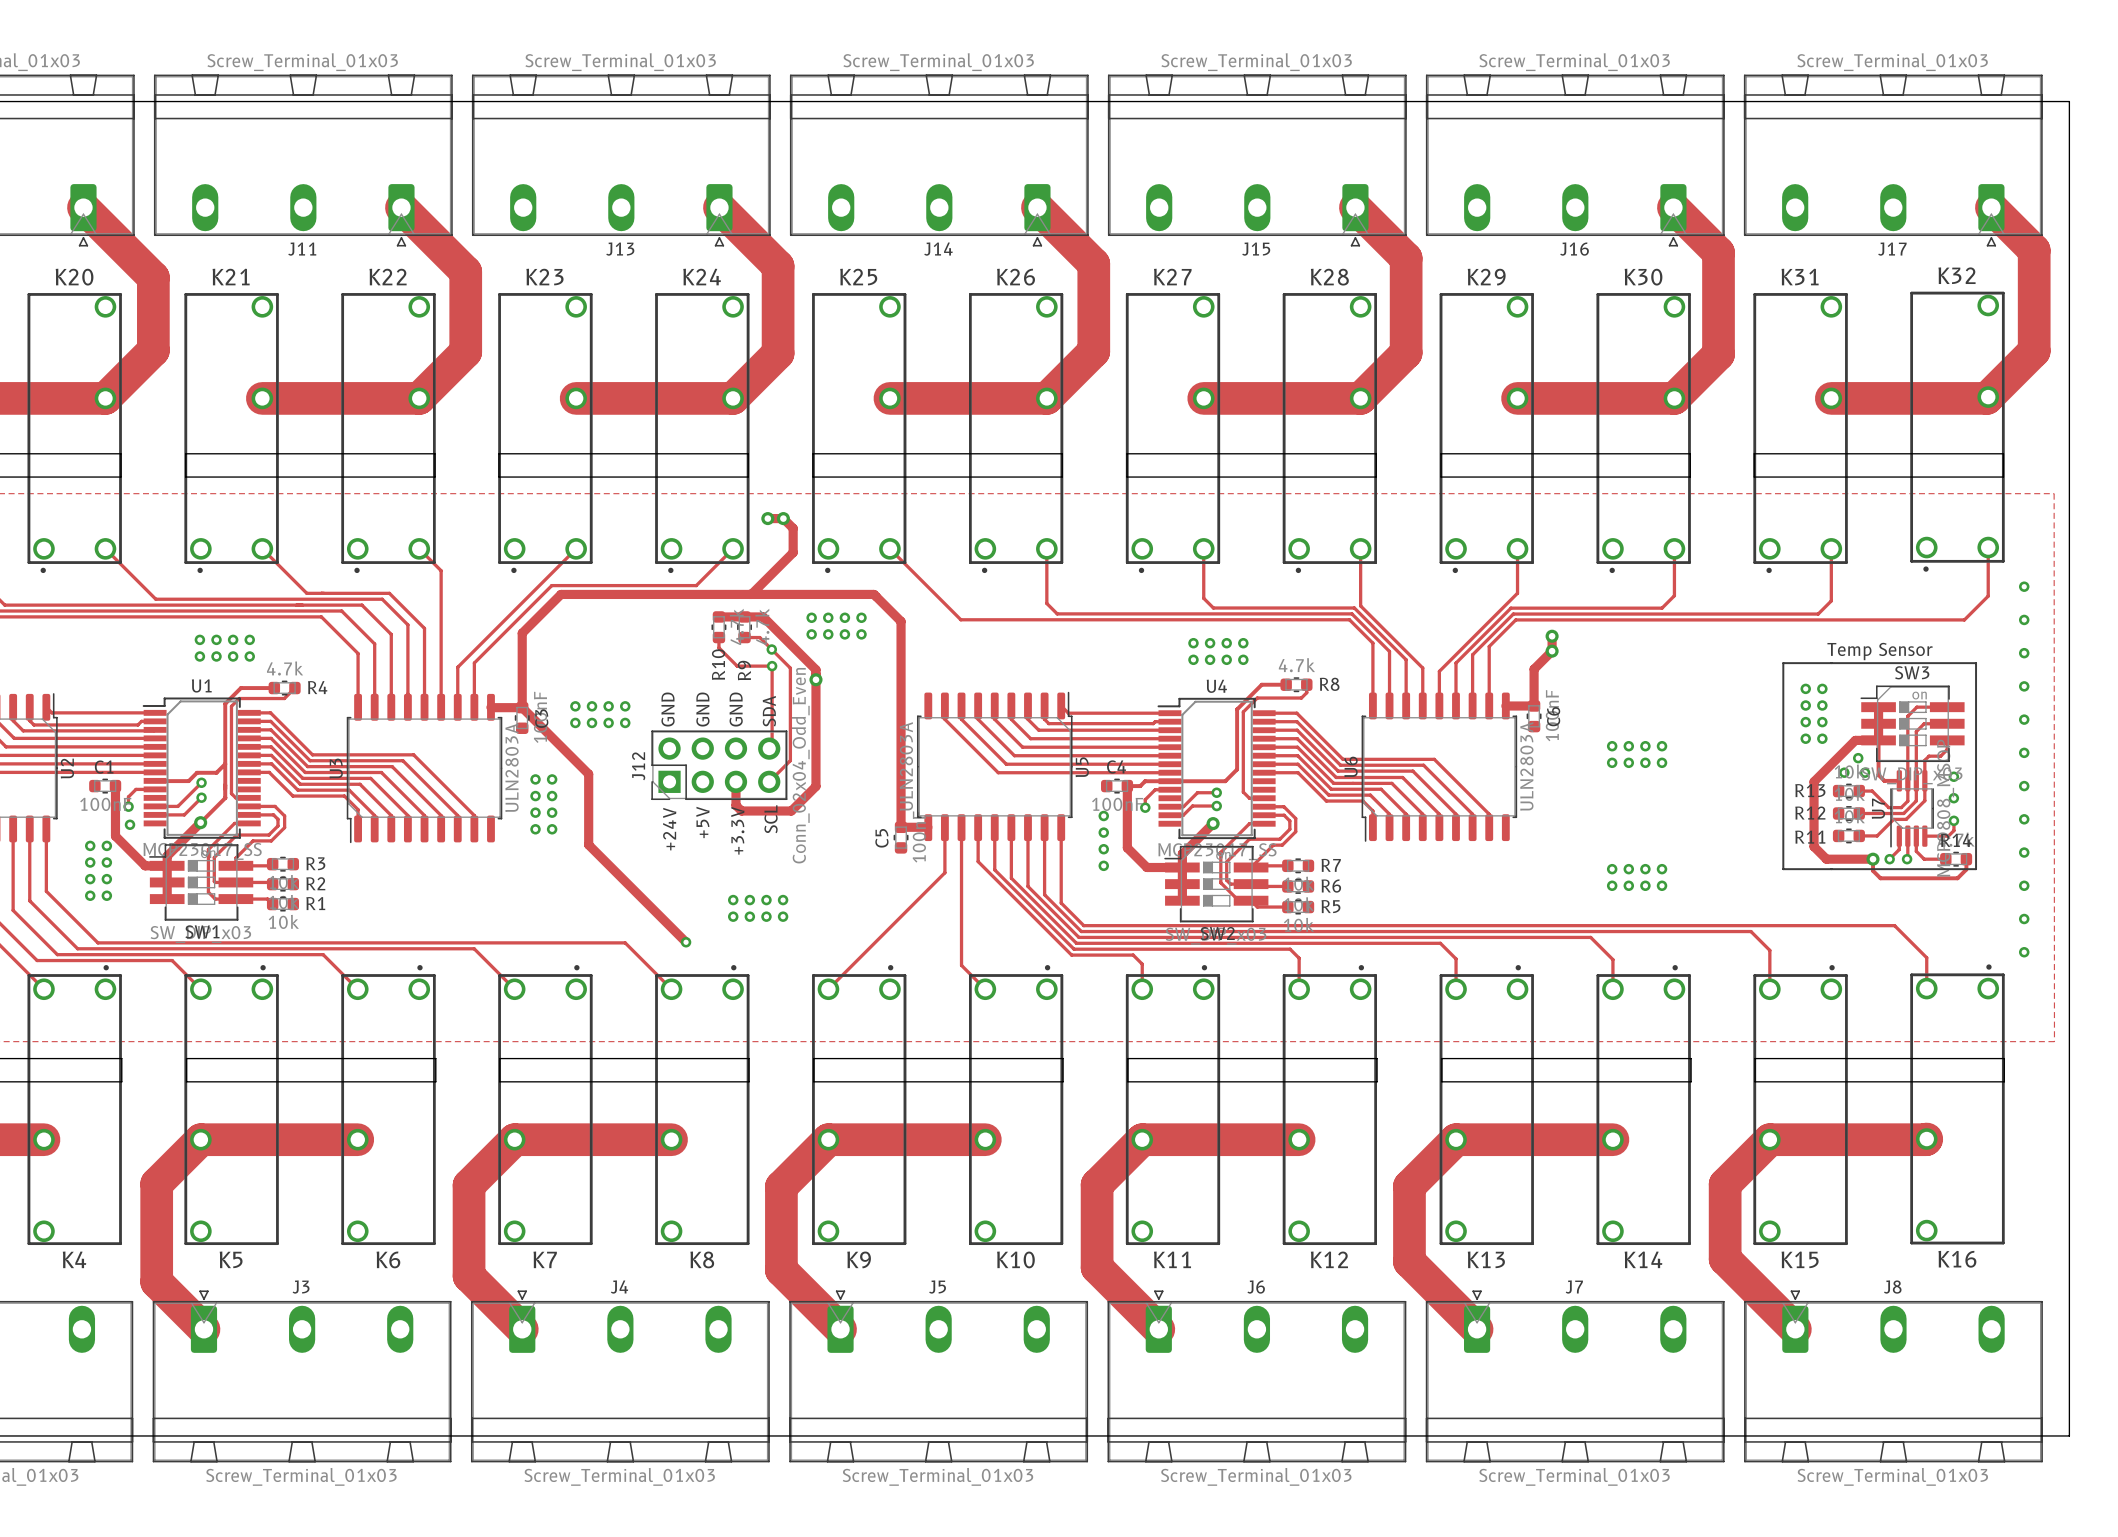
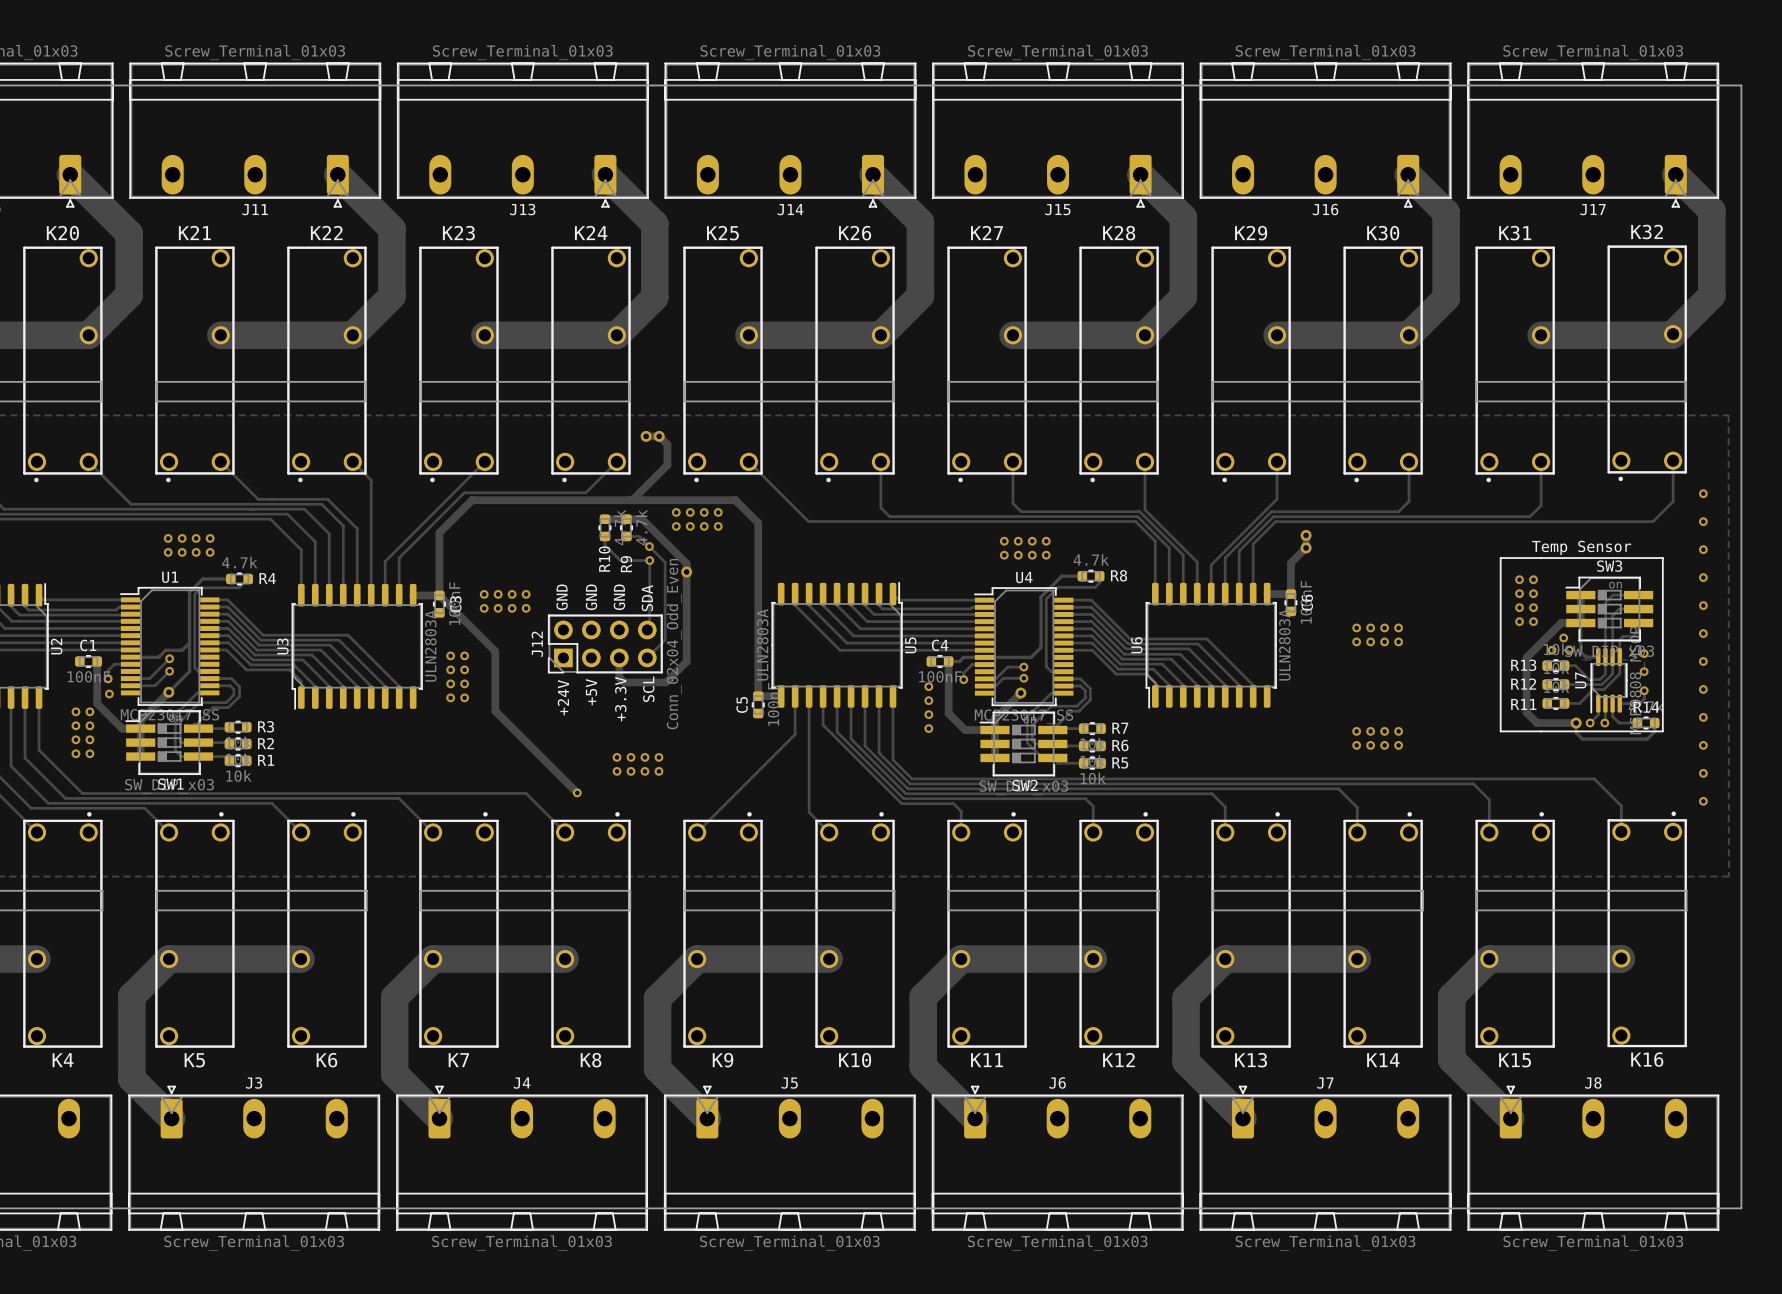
via: none -> (676, 512)
via: none -> (690, 512)
via: none -> (704, 512)
via: none -> (718, 512)
via: (811, 617) -> none
via: (828, 617) -> none
via: (844, 617) -> none
via: (861, 617) -> none
via: none -> (676, 526)
via: none -> (690, 526)
via: none -> (704, 526)
via: none -> (718, 526)
via: (811, 634) -> none
via: (828, 634) -> none
via: (844, 634) -> none
via: (861, 634) -> none

